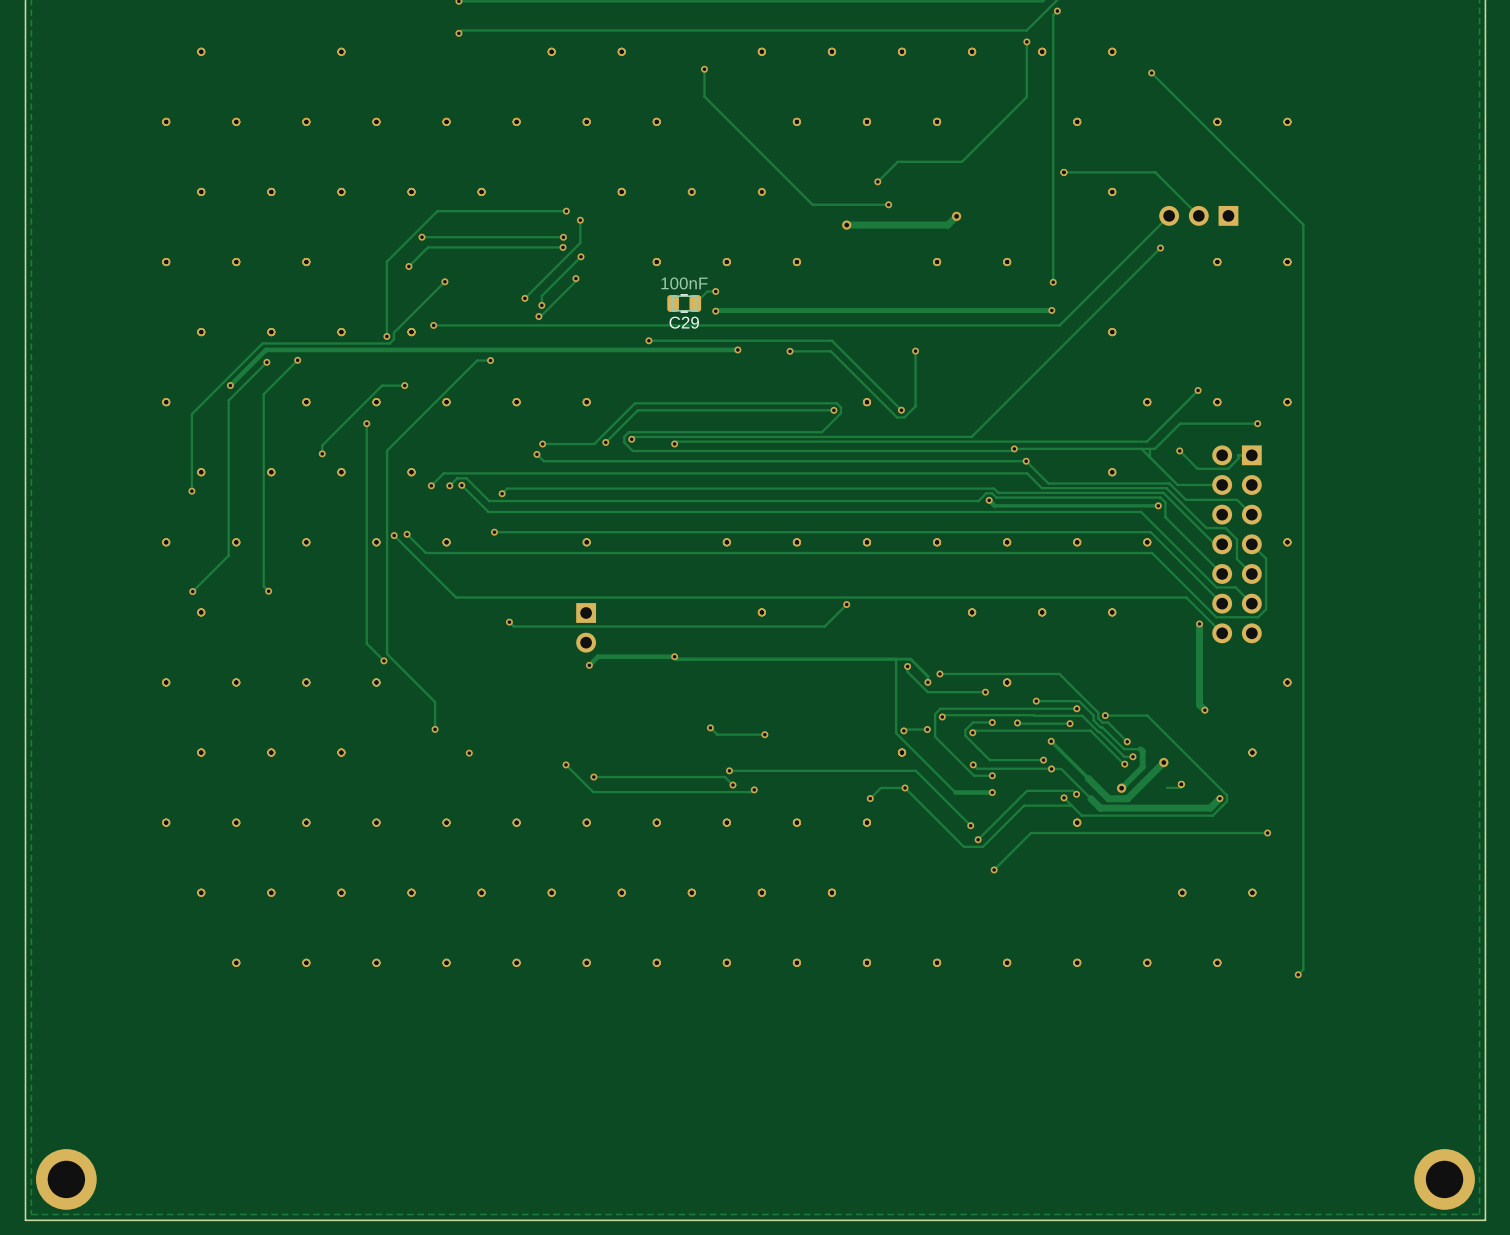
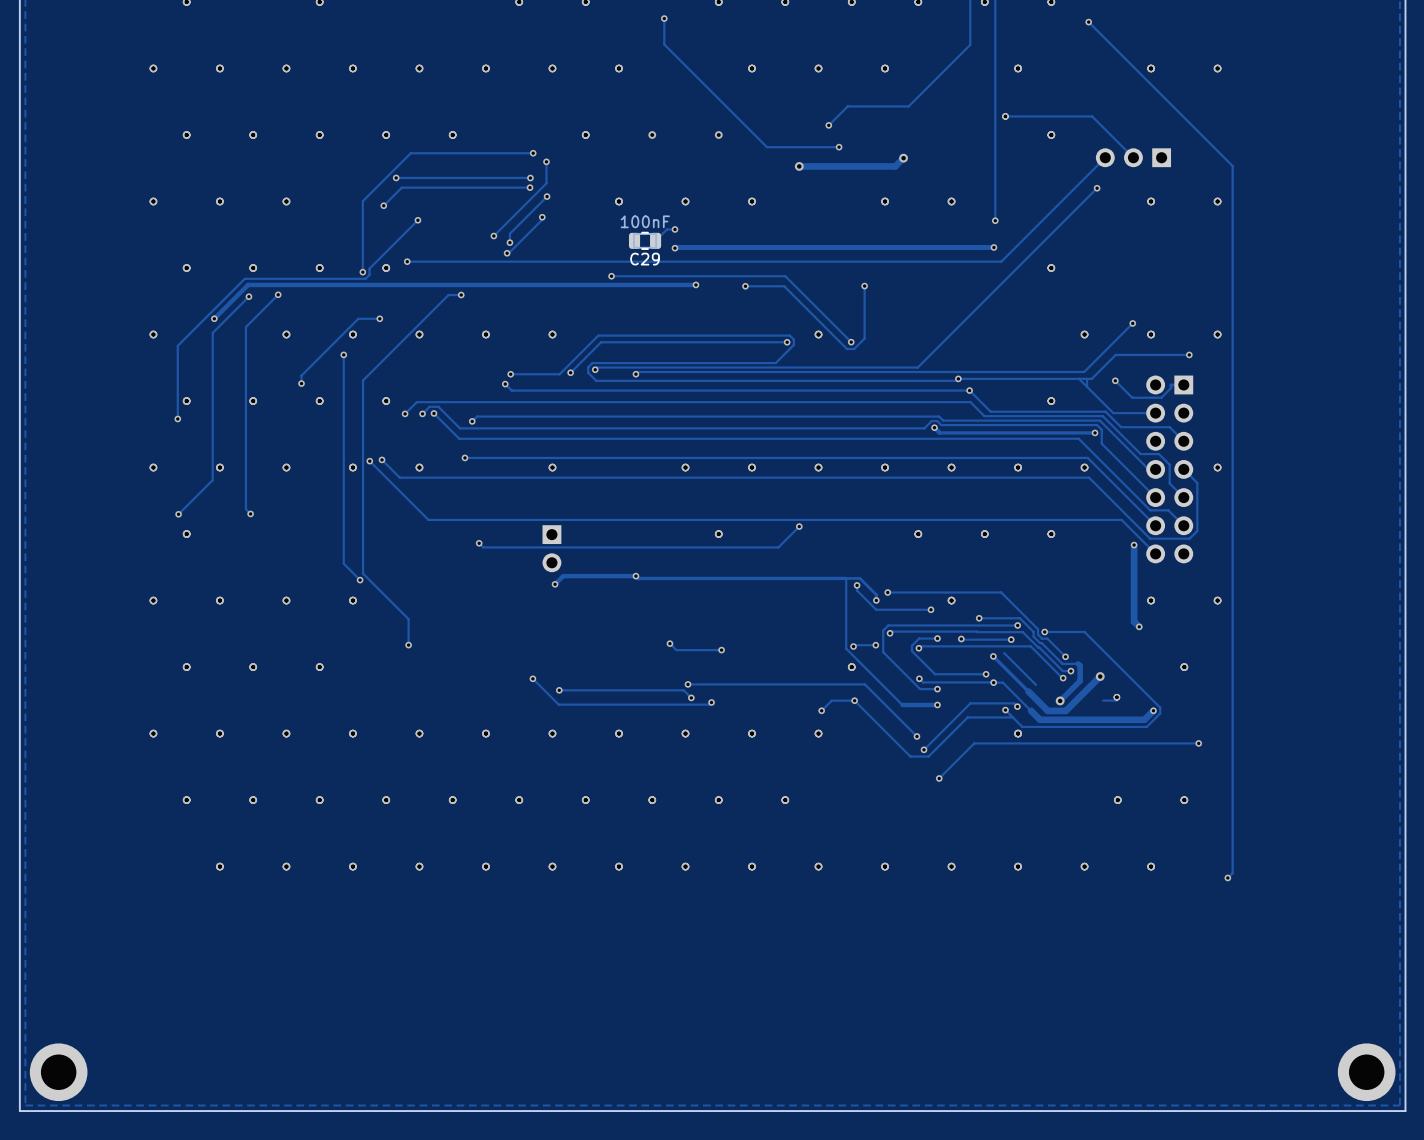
via: none -> (1151, 600)
track: none -> (1004, 653) (1036, 684)
via: (469, 753) -> none

